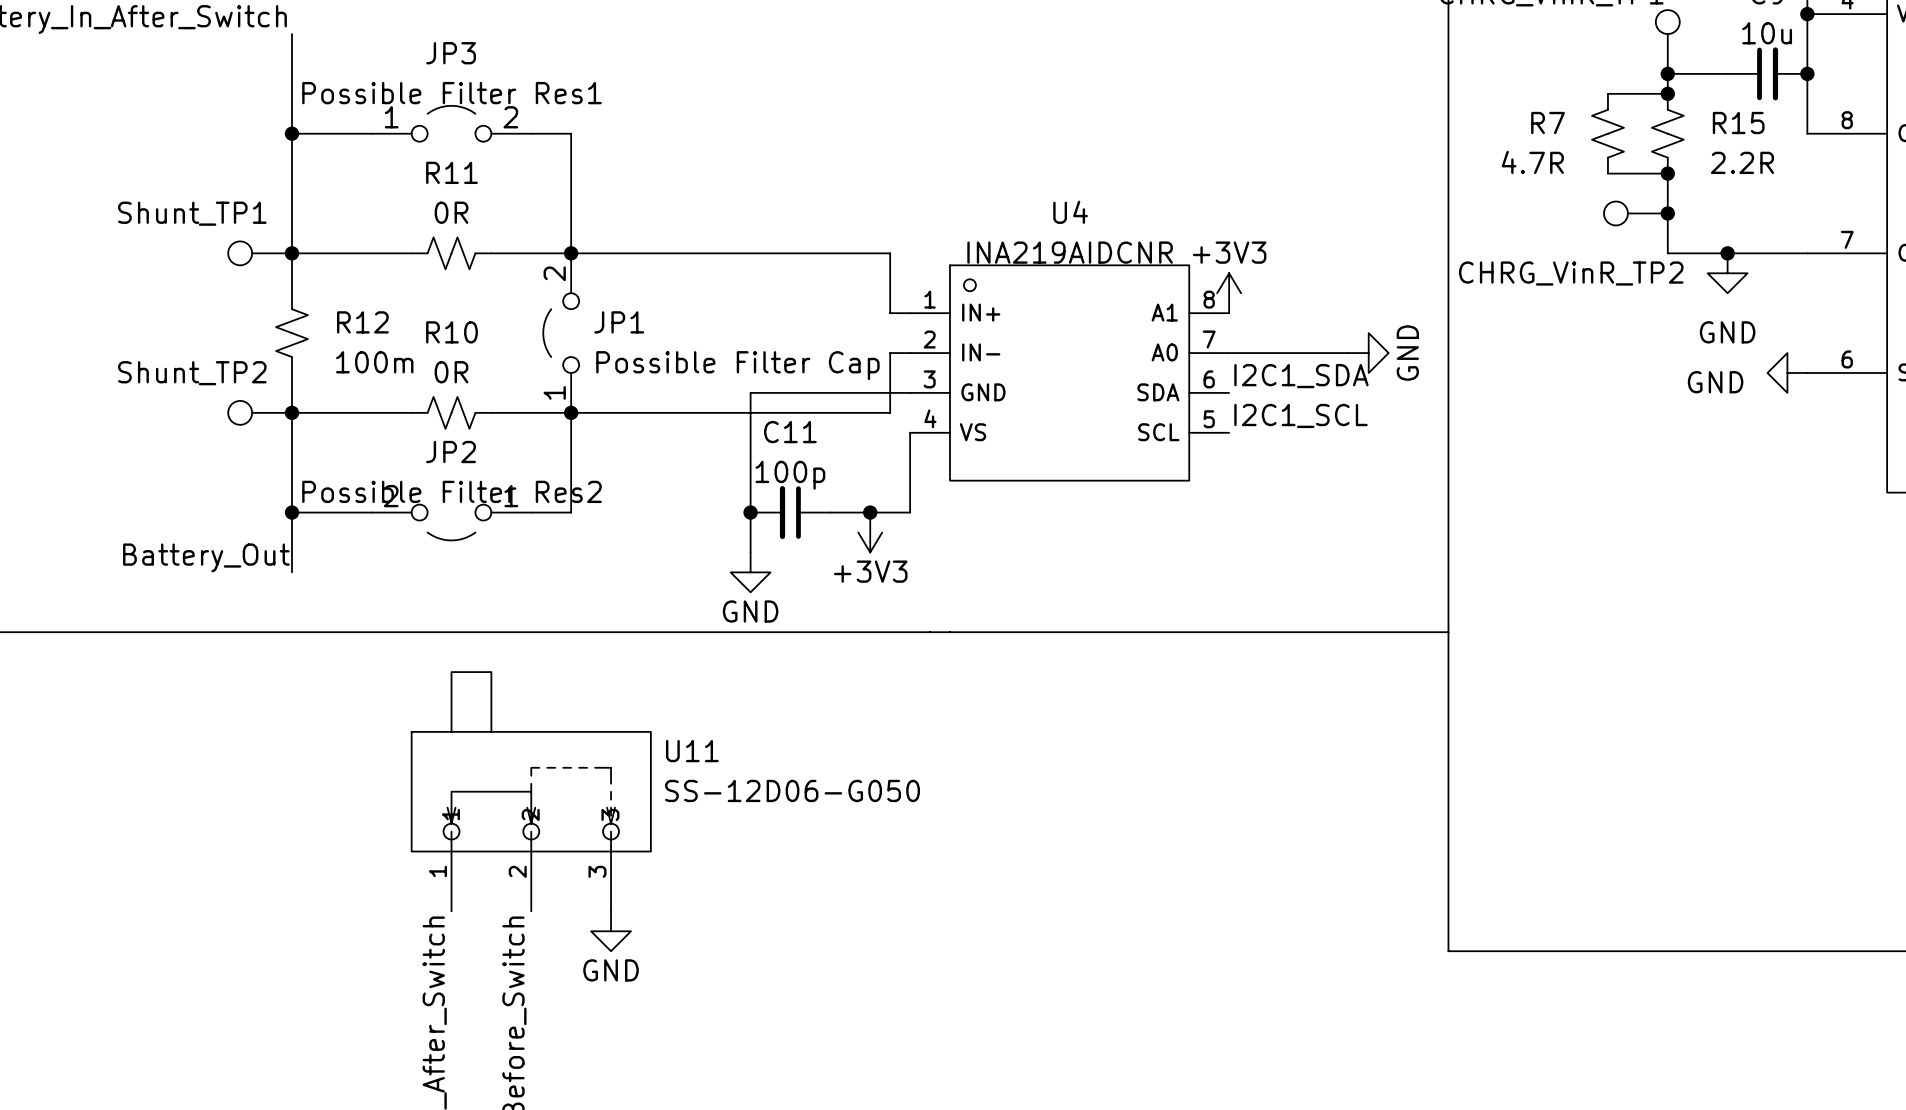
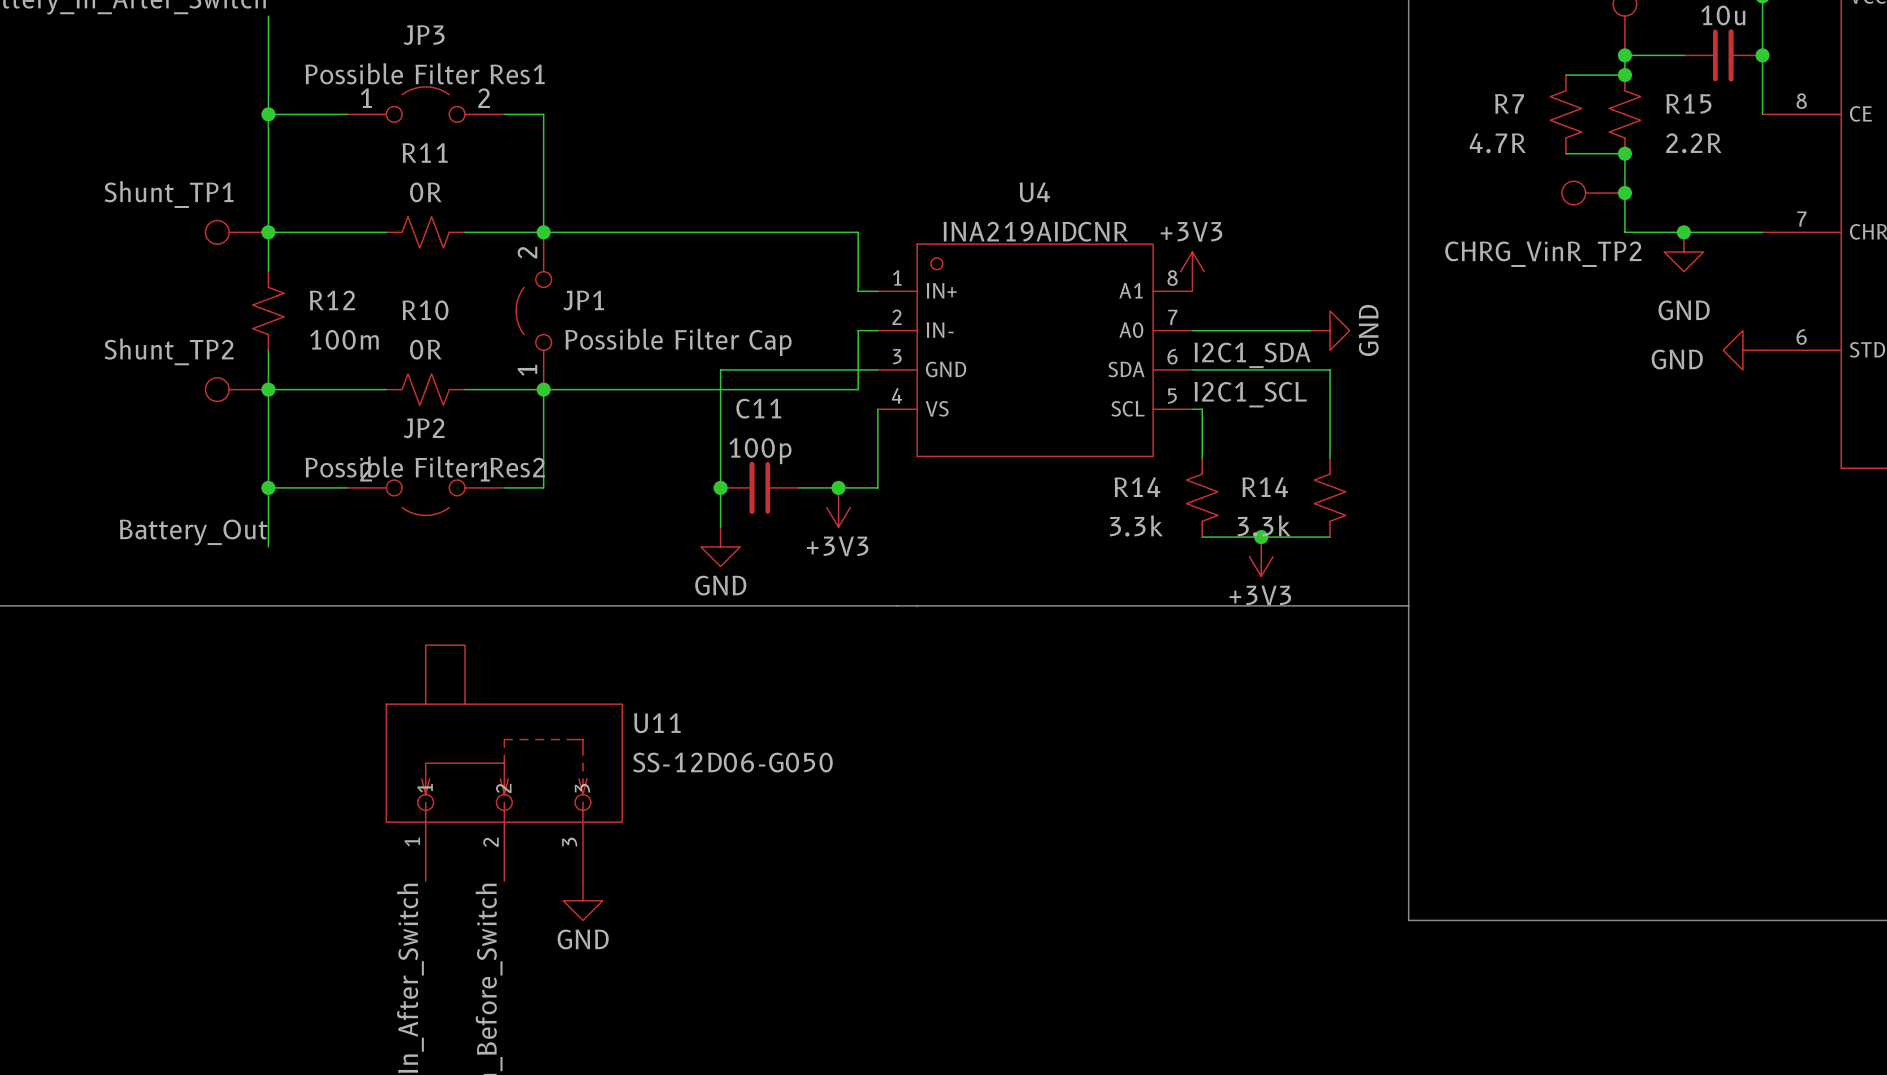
wire: none -> (1192, 369) (1330, 369) (1330, 458)
wire: none -> (1192, 409) (1202, 409) (1202, 458)
R14: none -> 3.3k (1202, 497)
R14: none -> 3.3k (1330, 497)
wire: none -> (1202, 537) (1330, 537)
junction: none -> (1261, 537)
power symbol: none -> +3V3 (1261, 556)

